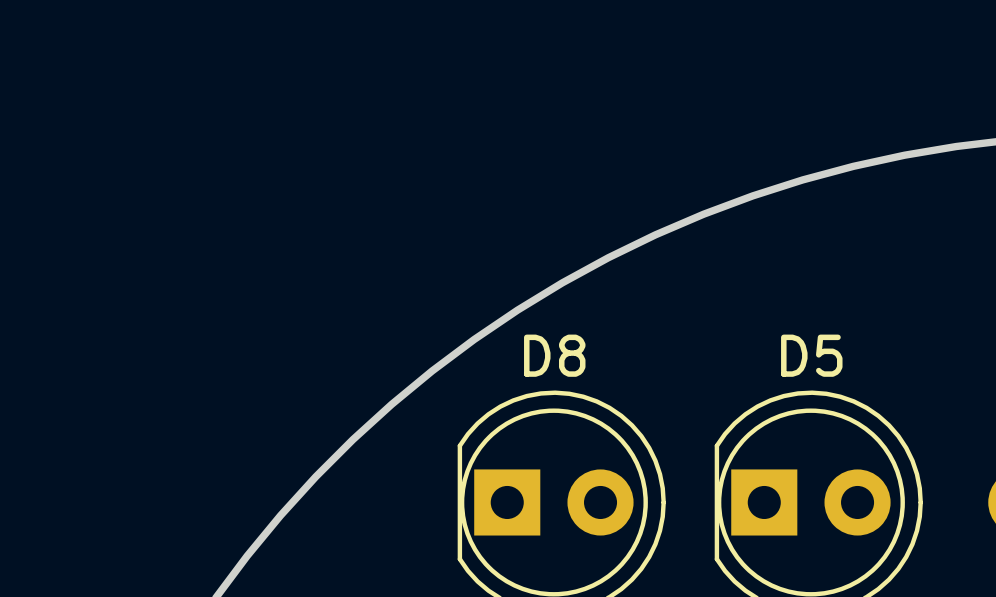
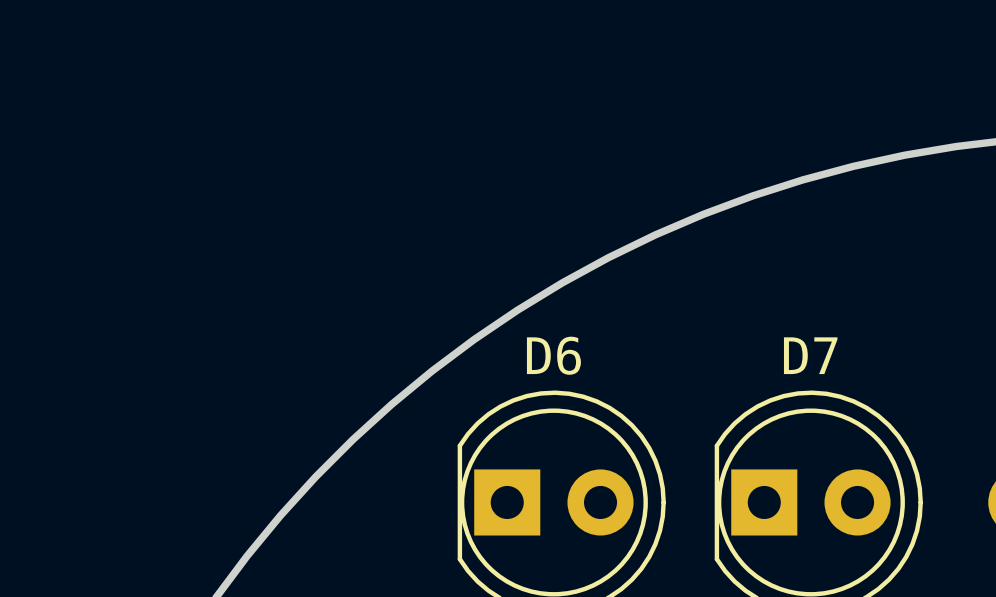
D8 name: D8 (554, 355) -> D6 (553, 355)
D5 name: D5 (811, 355) -> D7 (810, 355)

